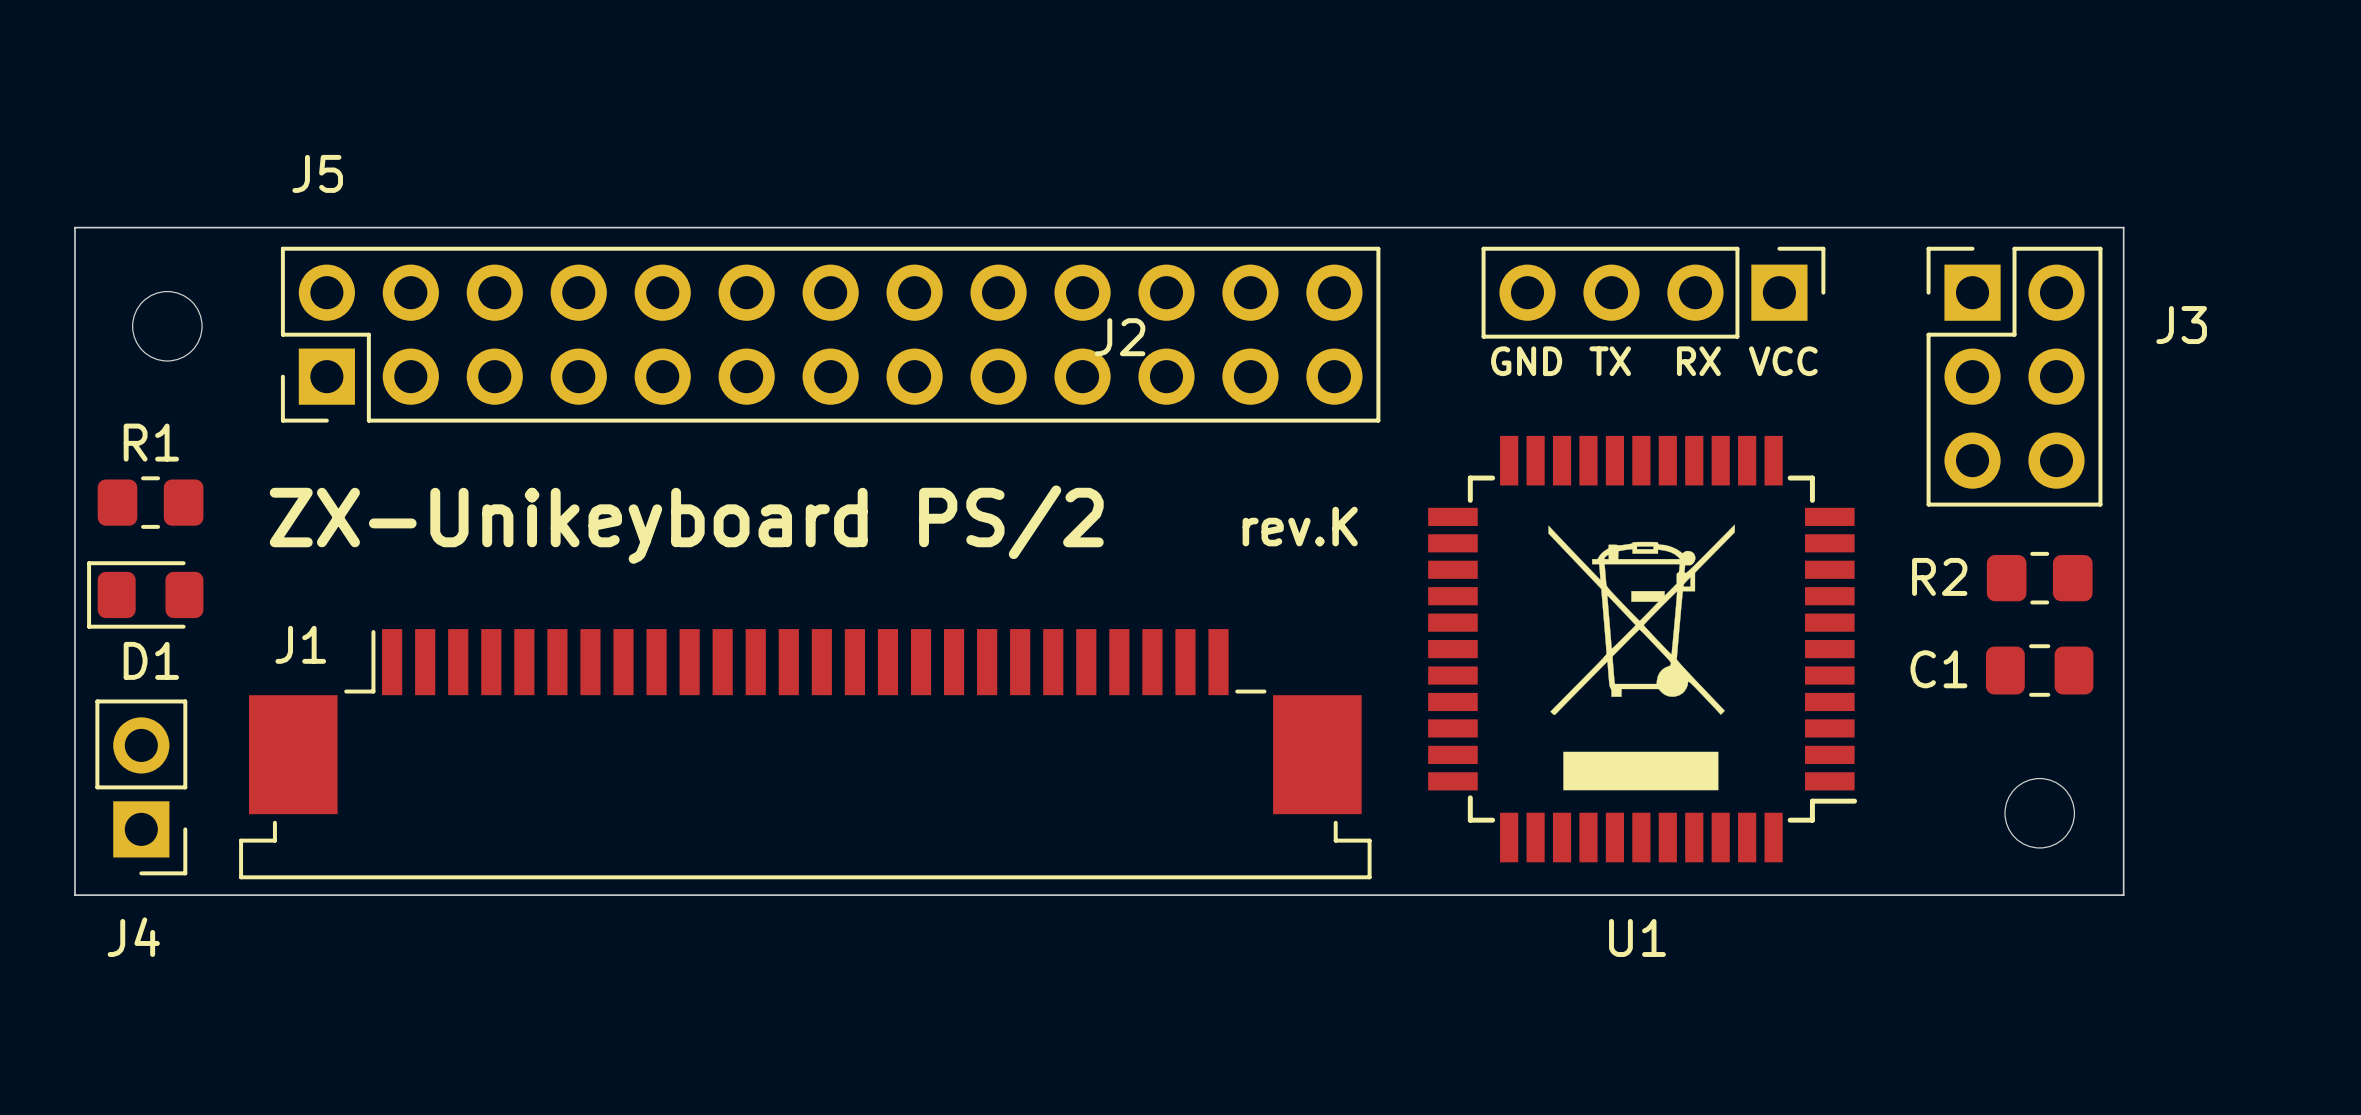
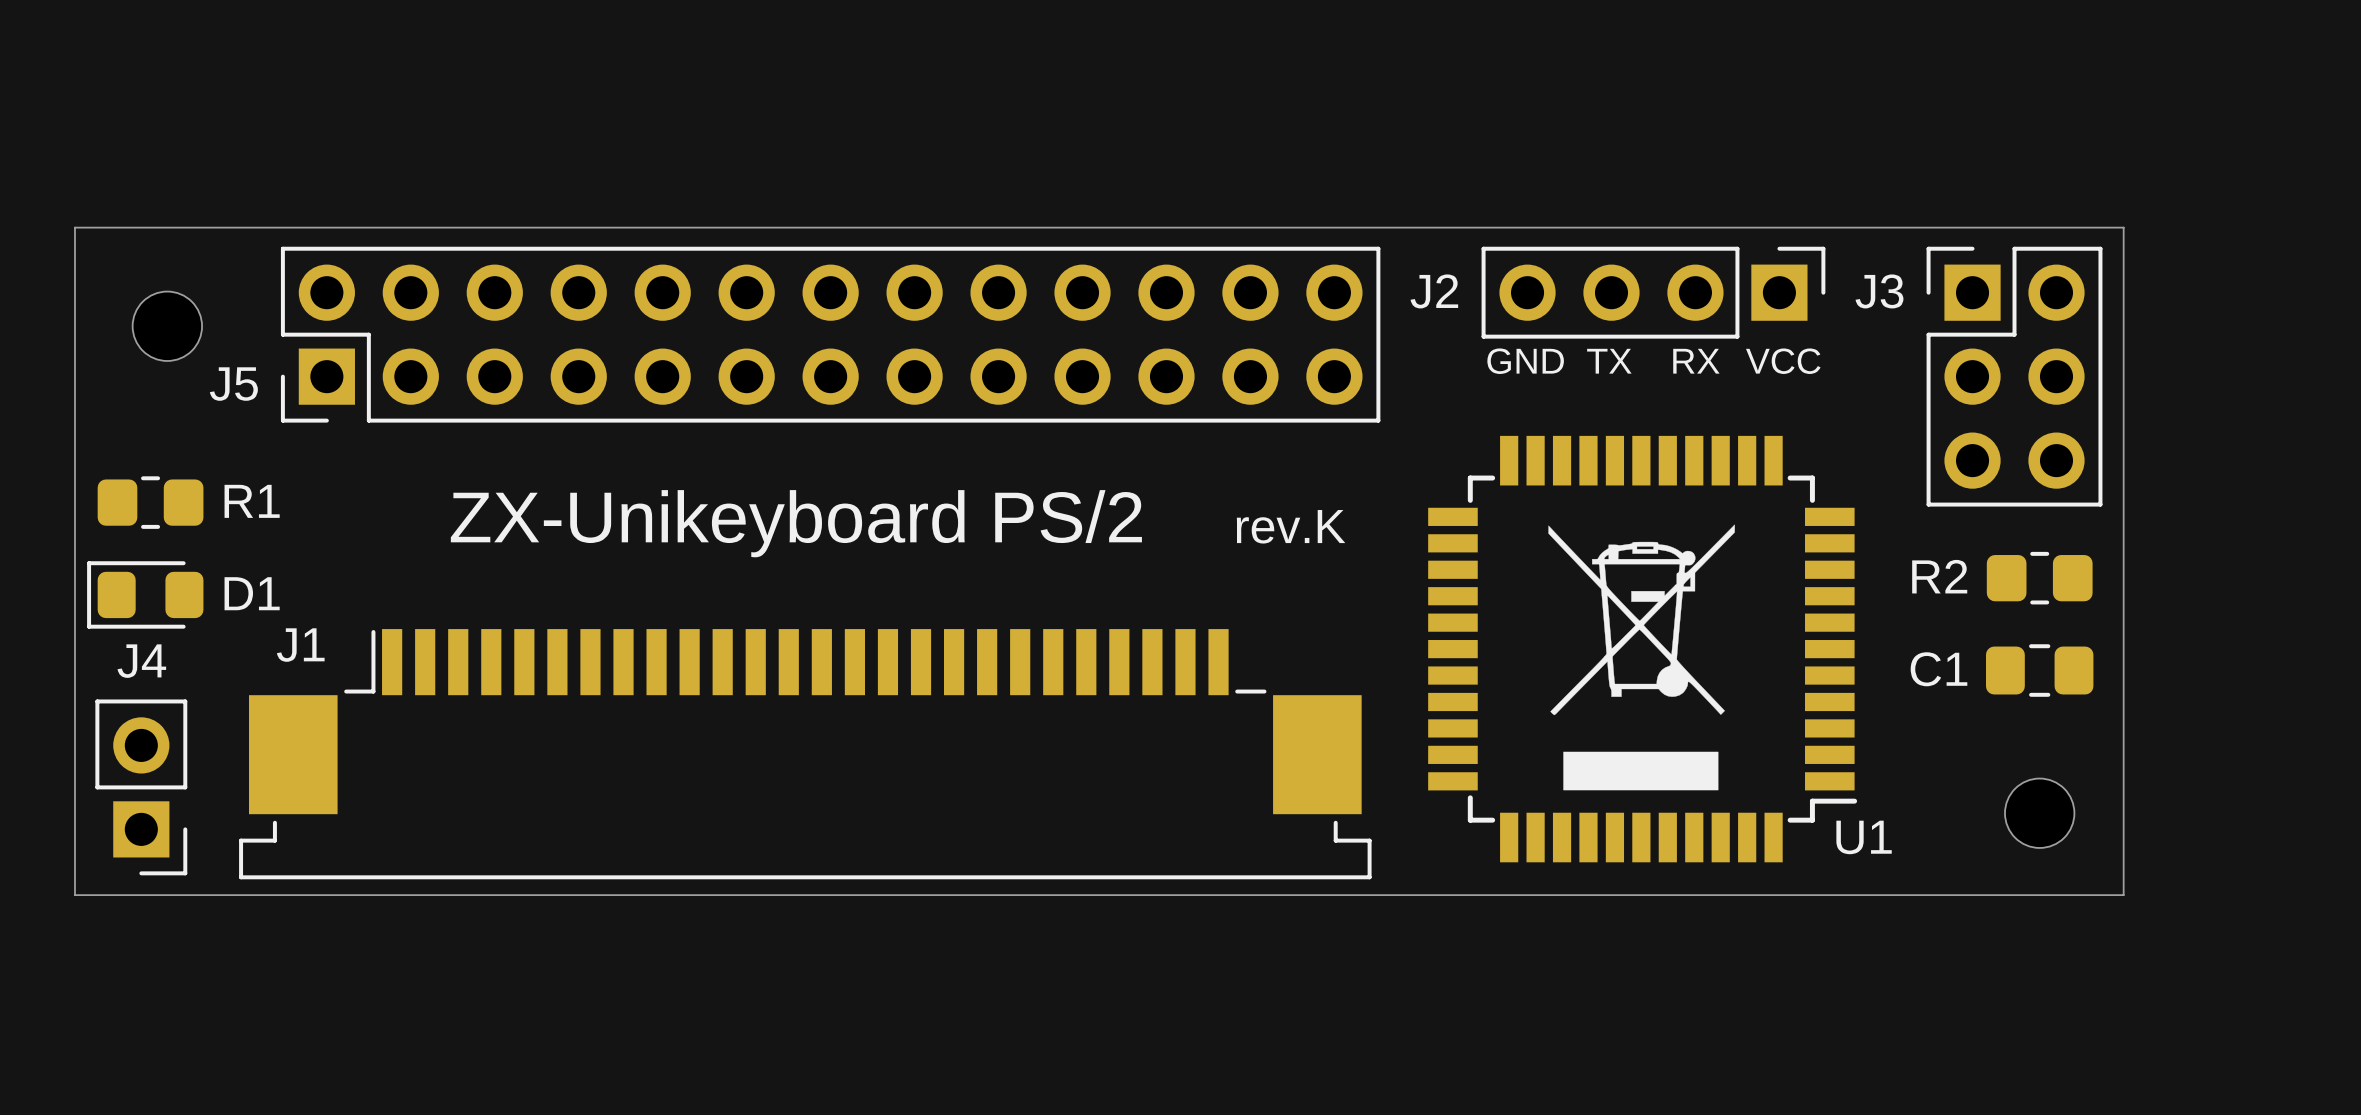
J5 name position: J5 (317, 173) -> J5 (233, 384)
J3 name position: J3 (2181, 325) -> J3 (1879, 291)
J2 name position: J2 (1120, 337) -> J2 (1434, 291)
R1 name position: R1 (151, 442) -> R1 (252, 501)
text position: ZX-Unikeyboard PS/2 (686, 524) -> ZX-Unikeyboard PS/2 (796, 523)
D1 name position: D1 (151, 660) -> D1 (252, 593)
J4 name position: J4 (133, 937) -> J4 (141, 661)
U1 name position: U1 (1637, 937) -> U1 (1864, 837)

